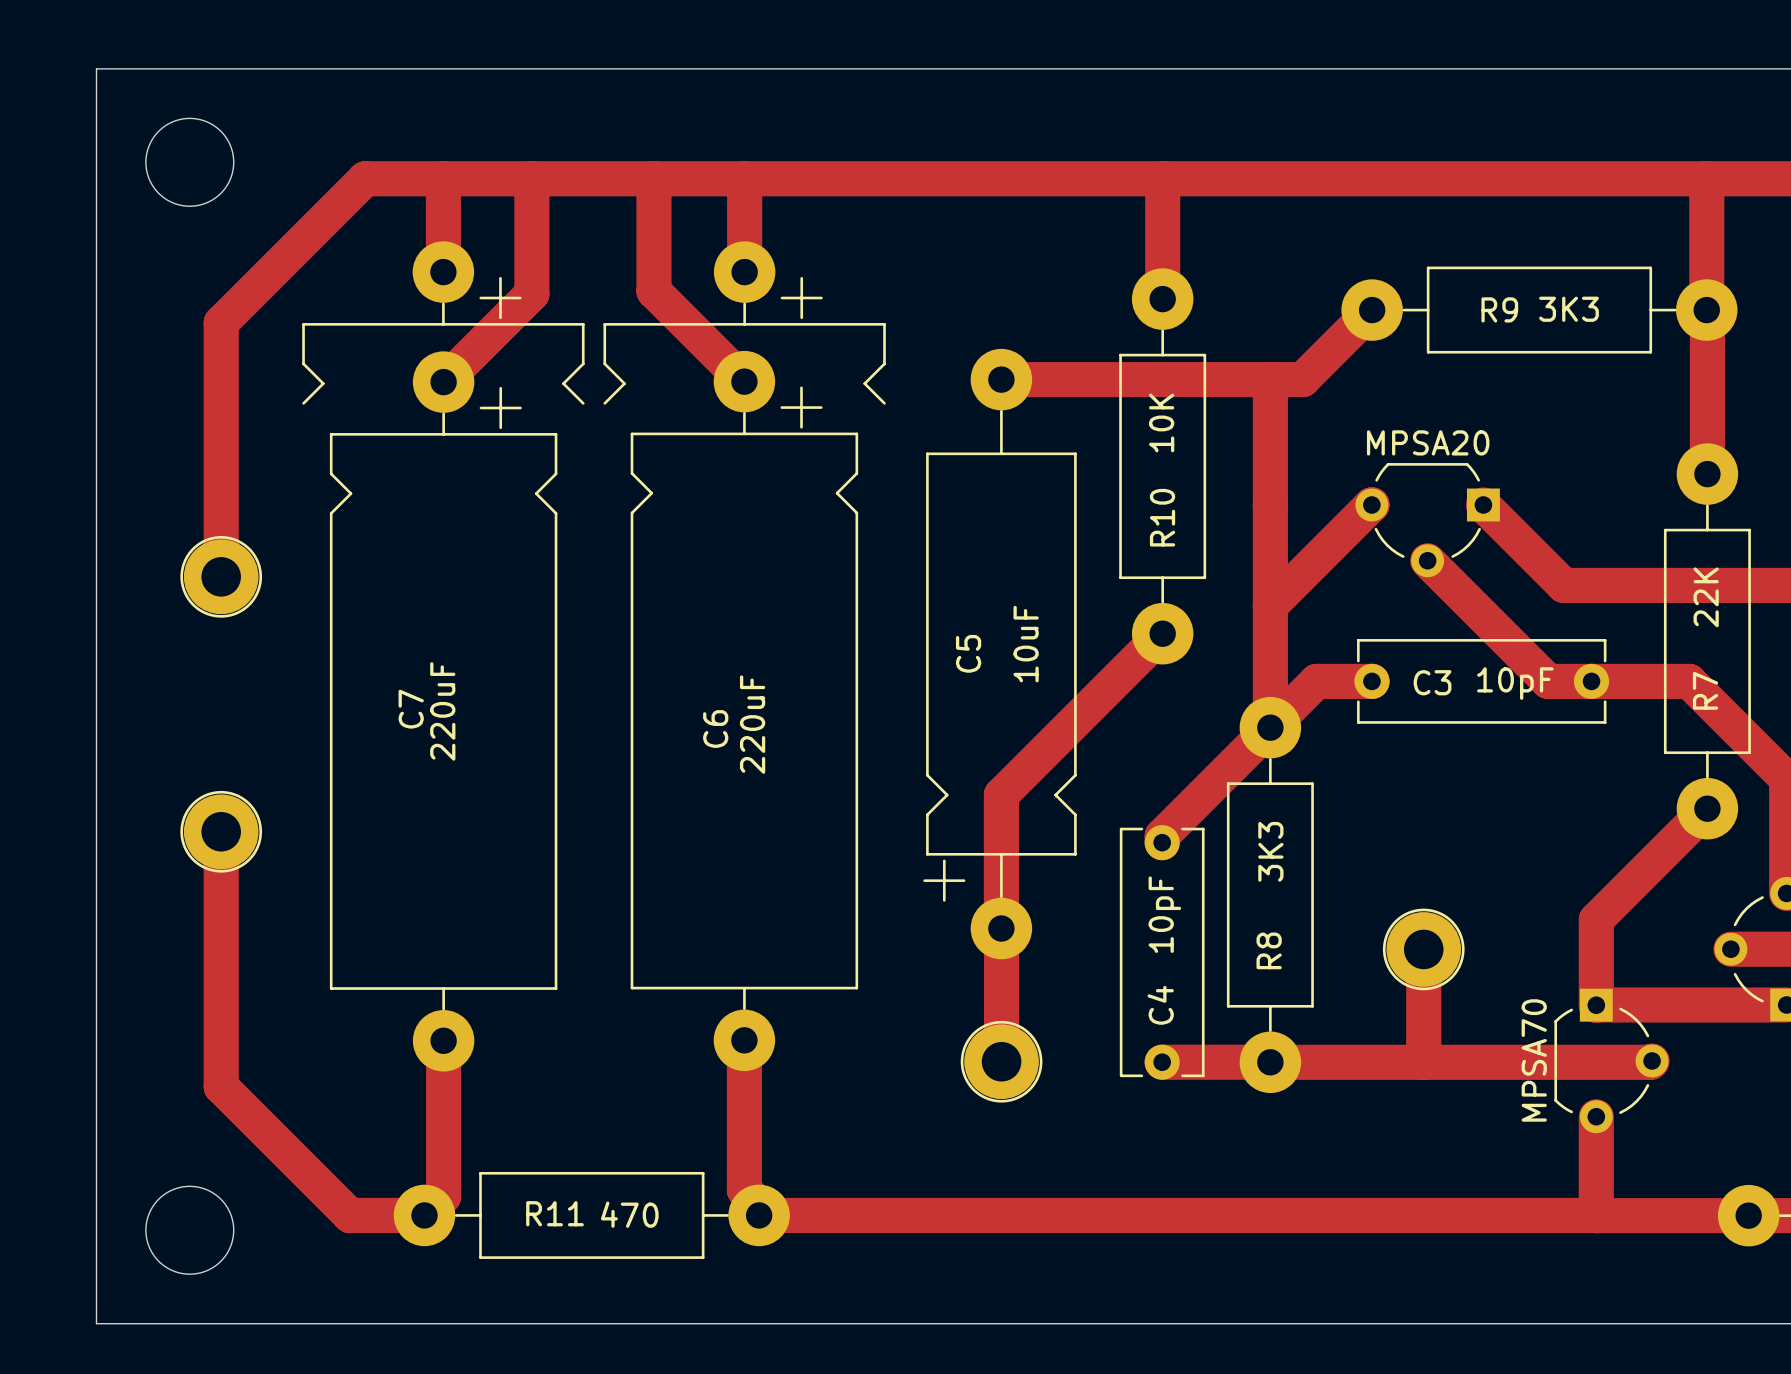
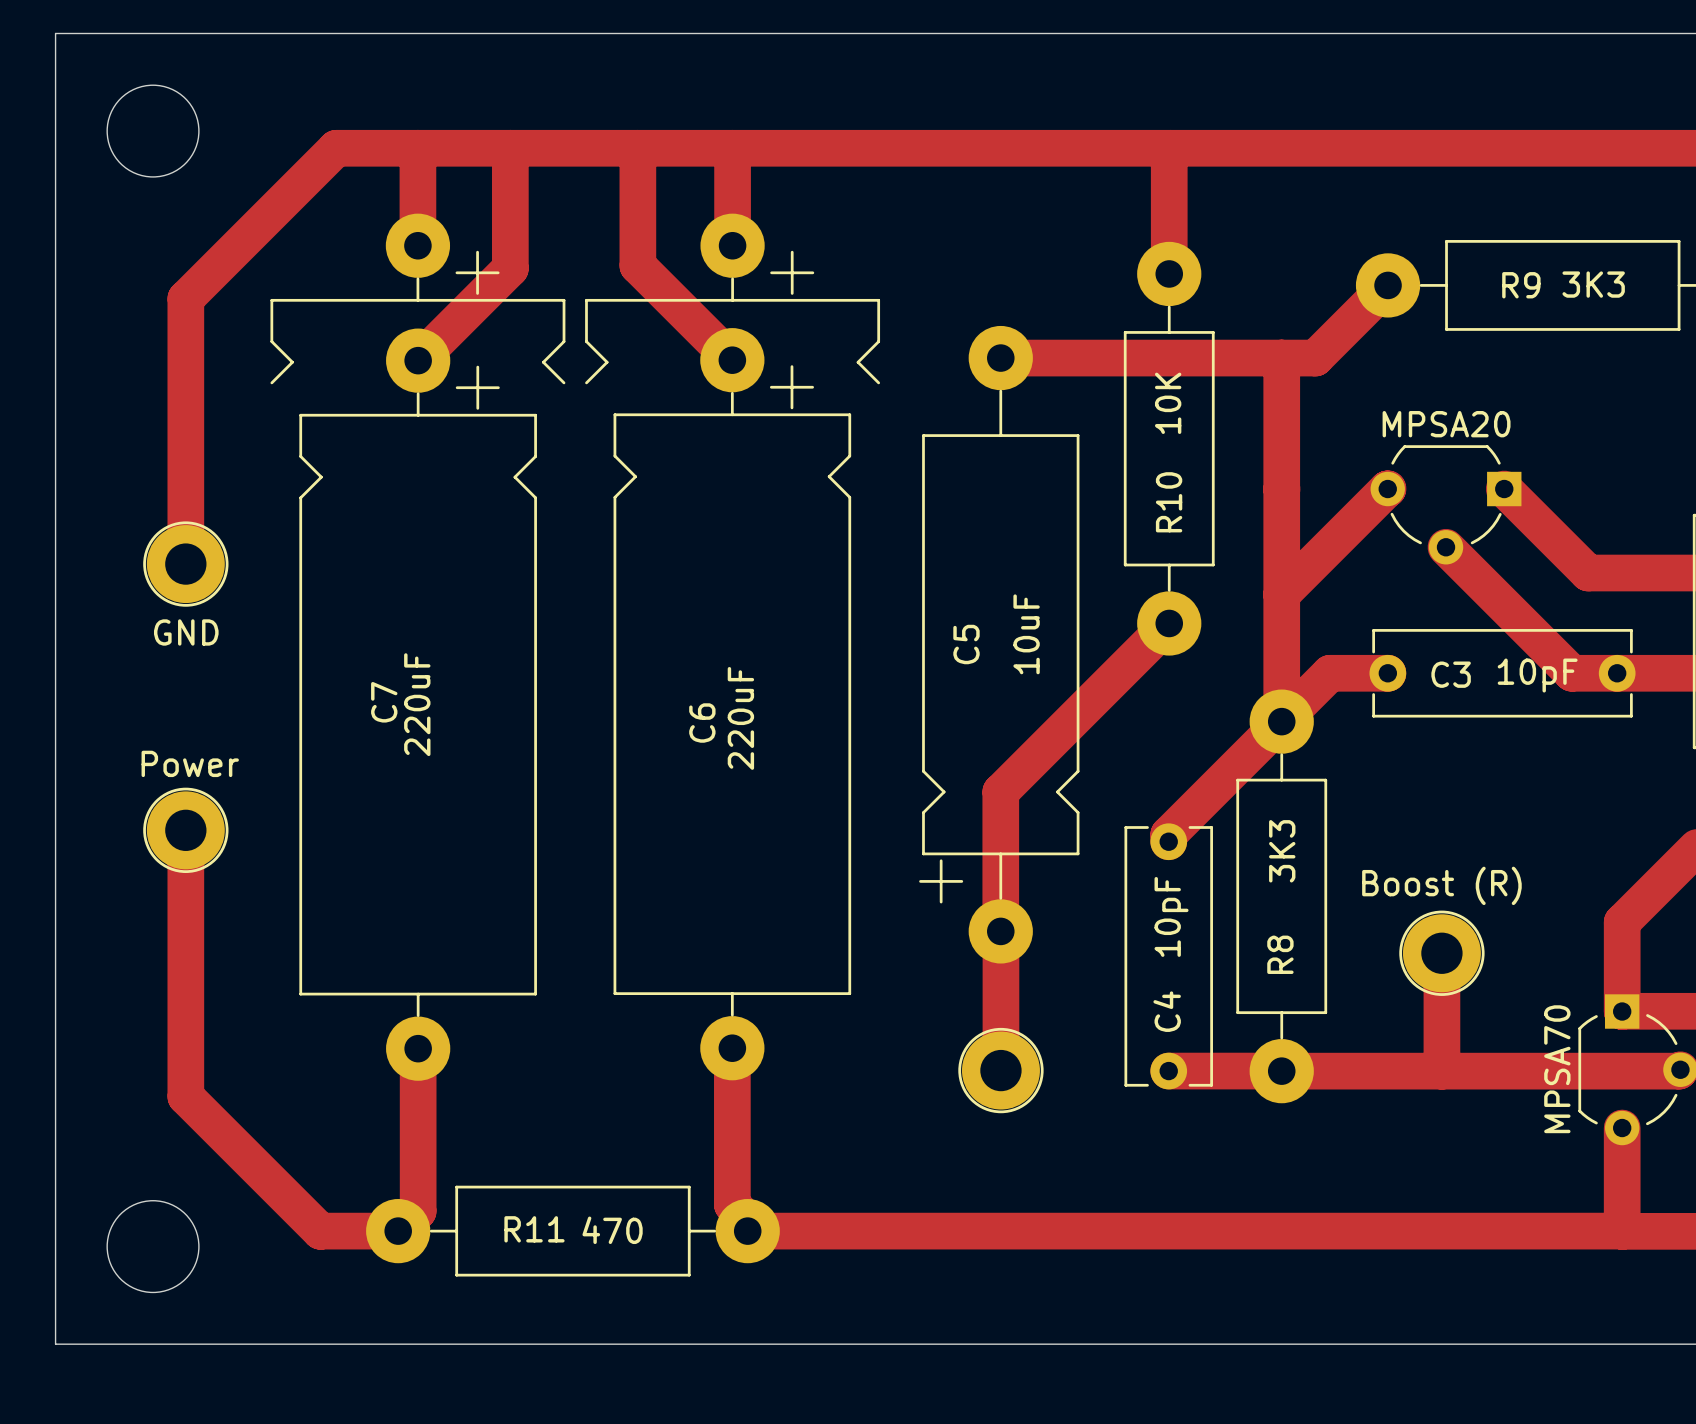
part value: none -> GND (186, 632)
part value: none -> Power (190, 763)
part value: none -> Boost (R) (1441, 885)

